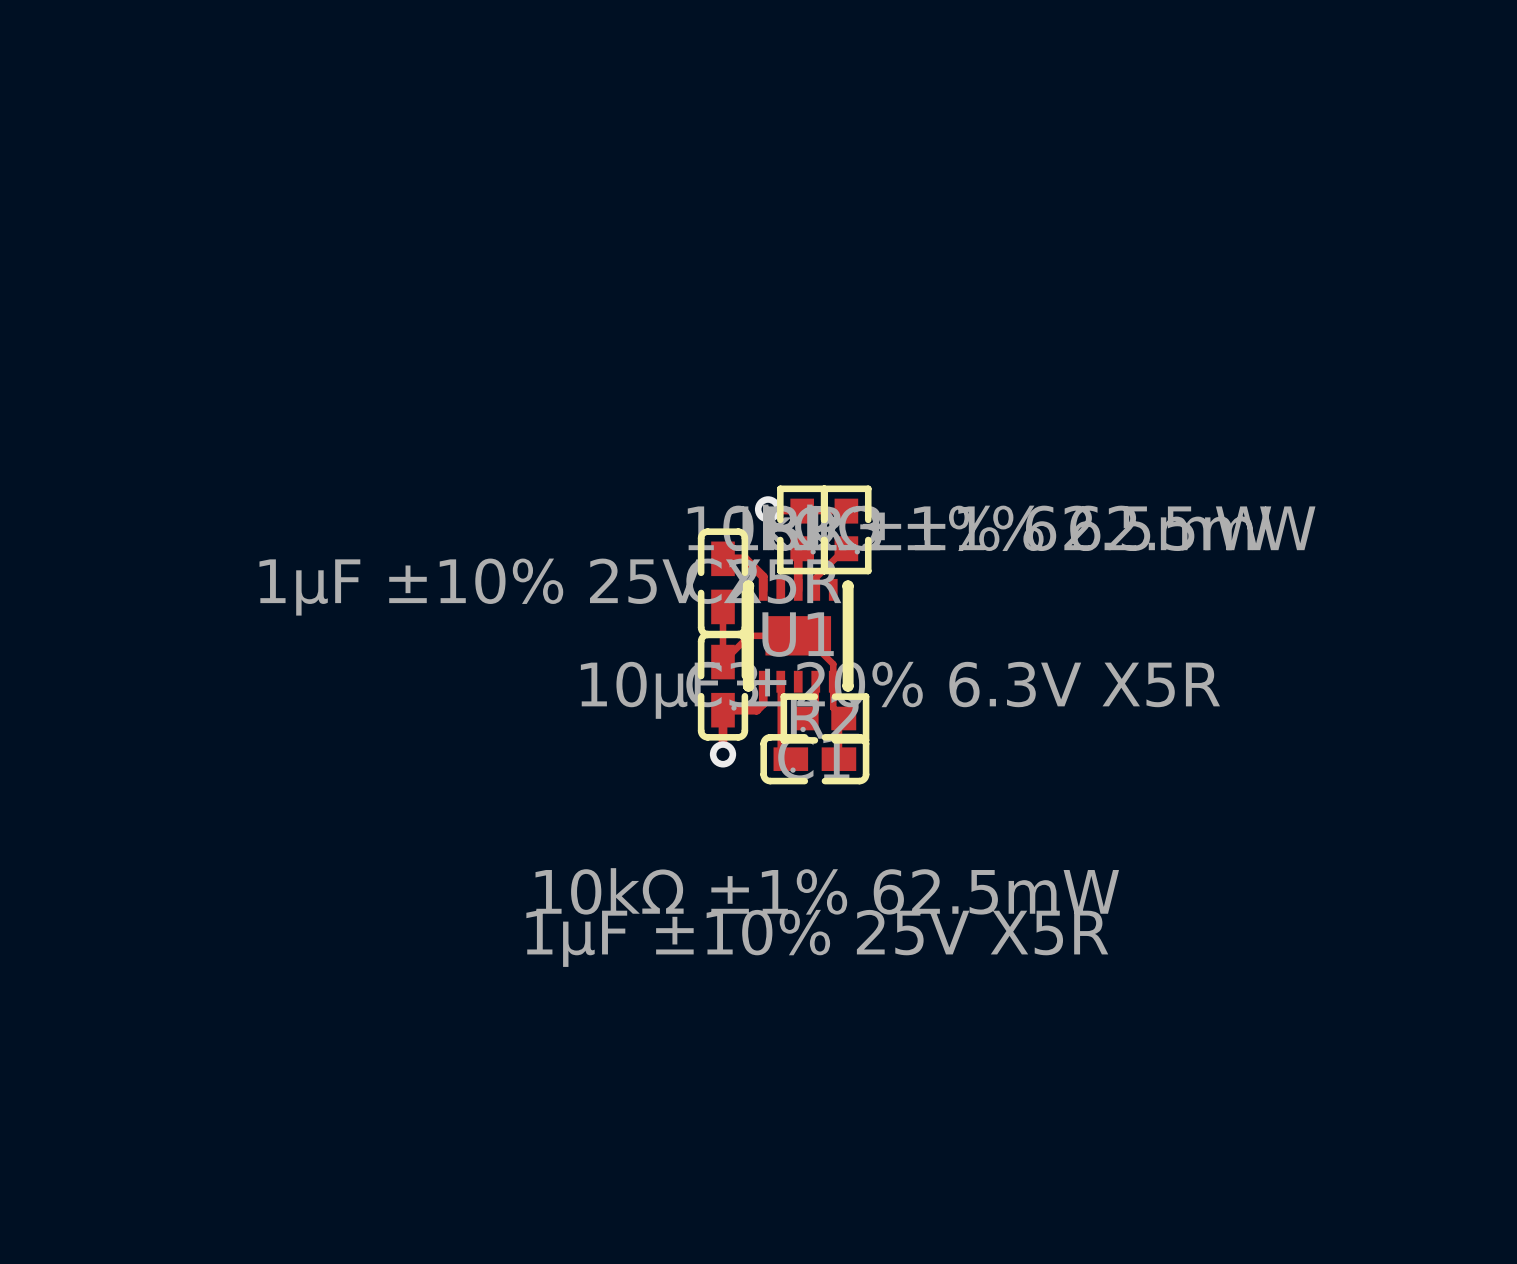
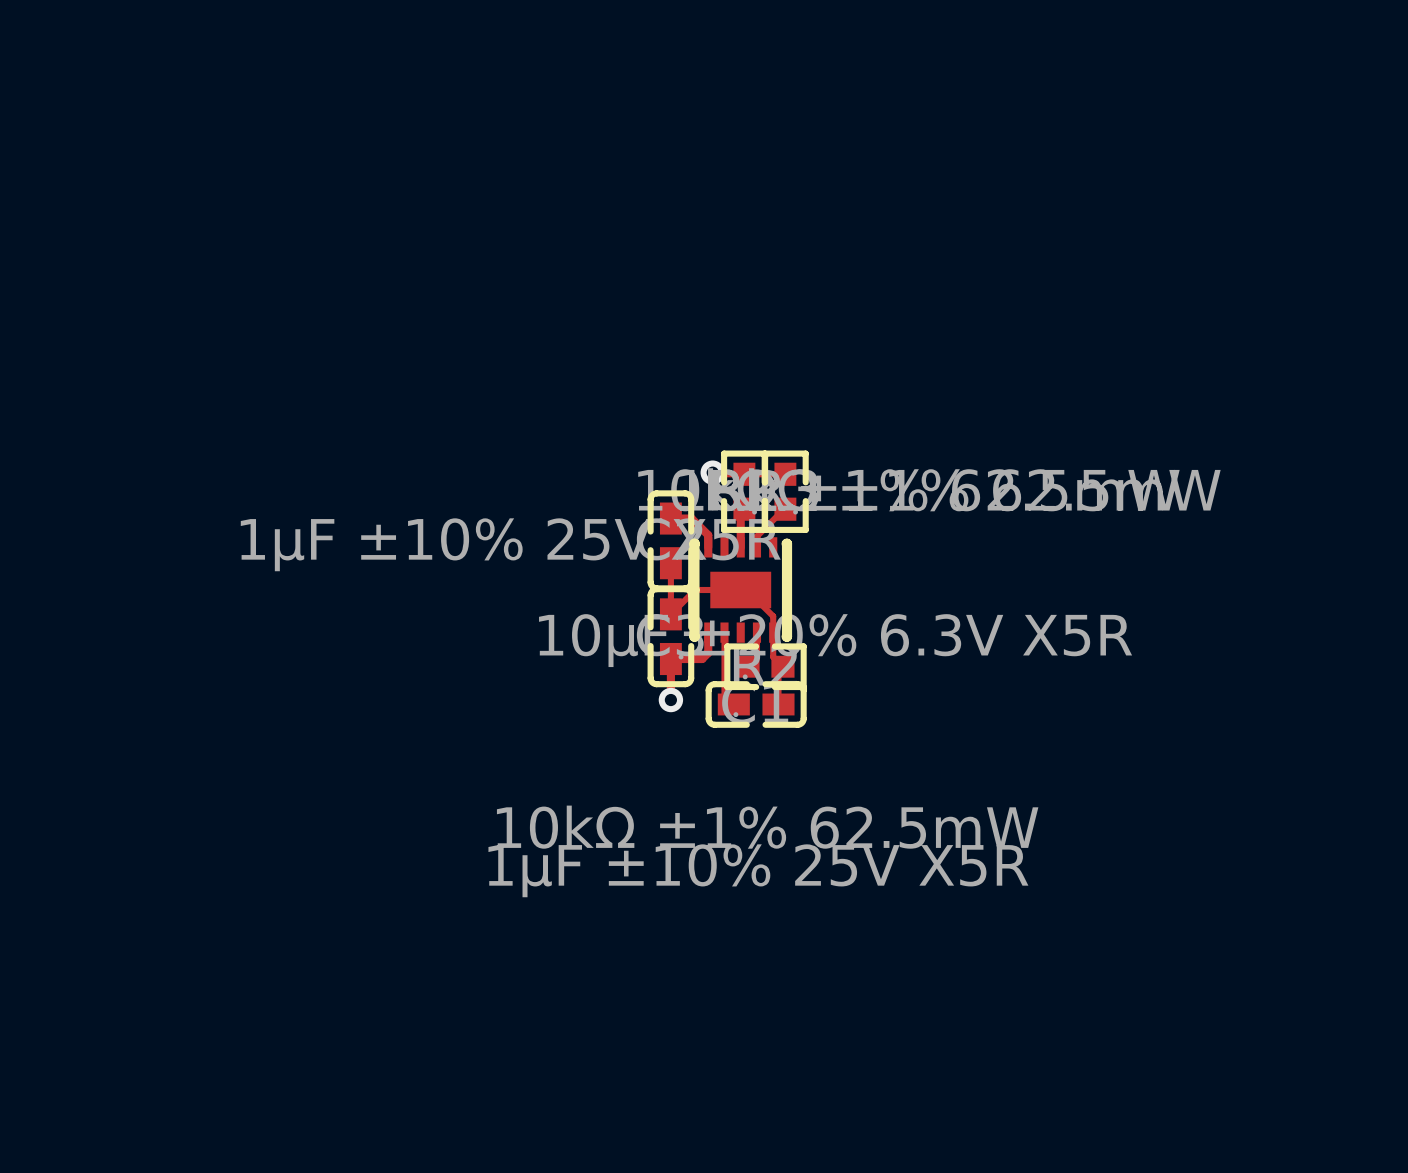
U1 name: U1 (798, 634) -> none

